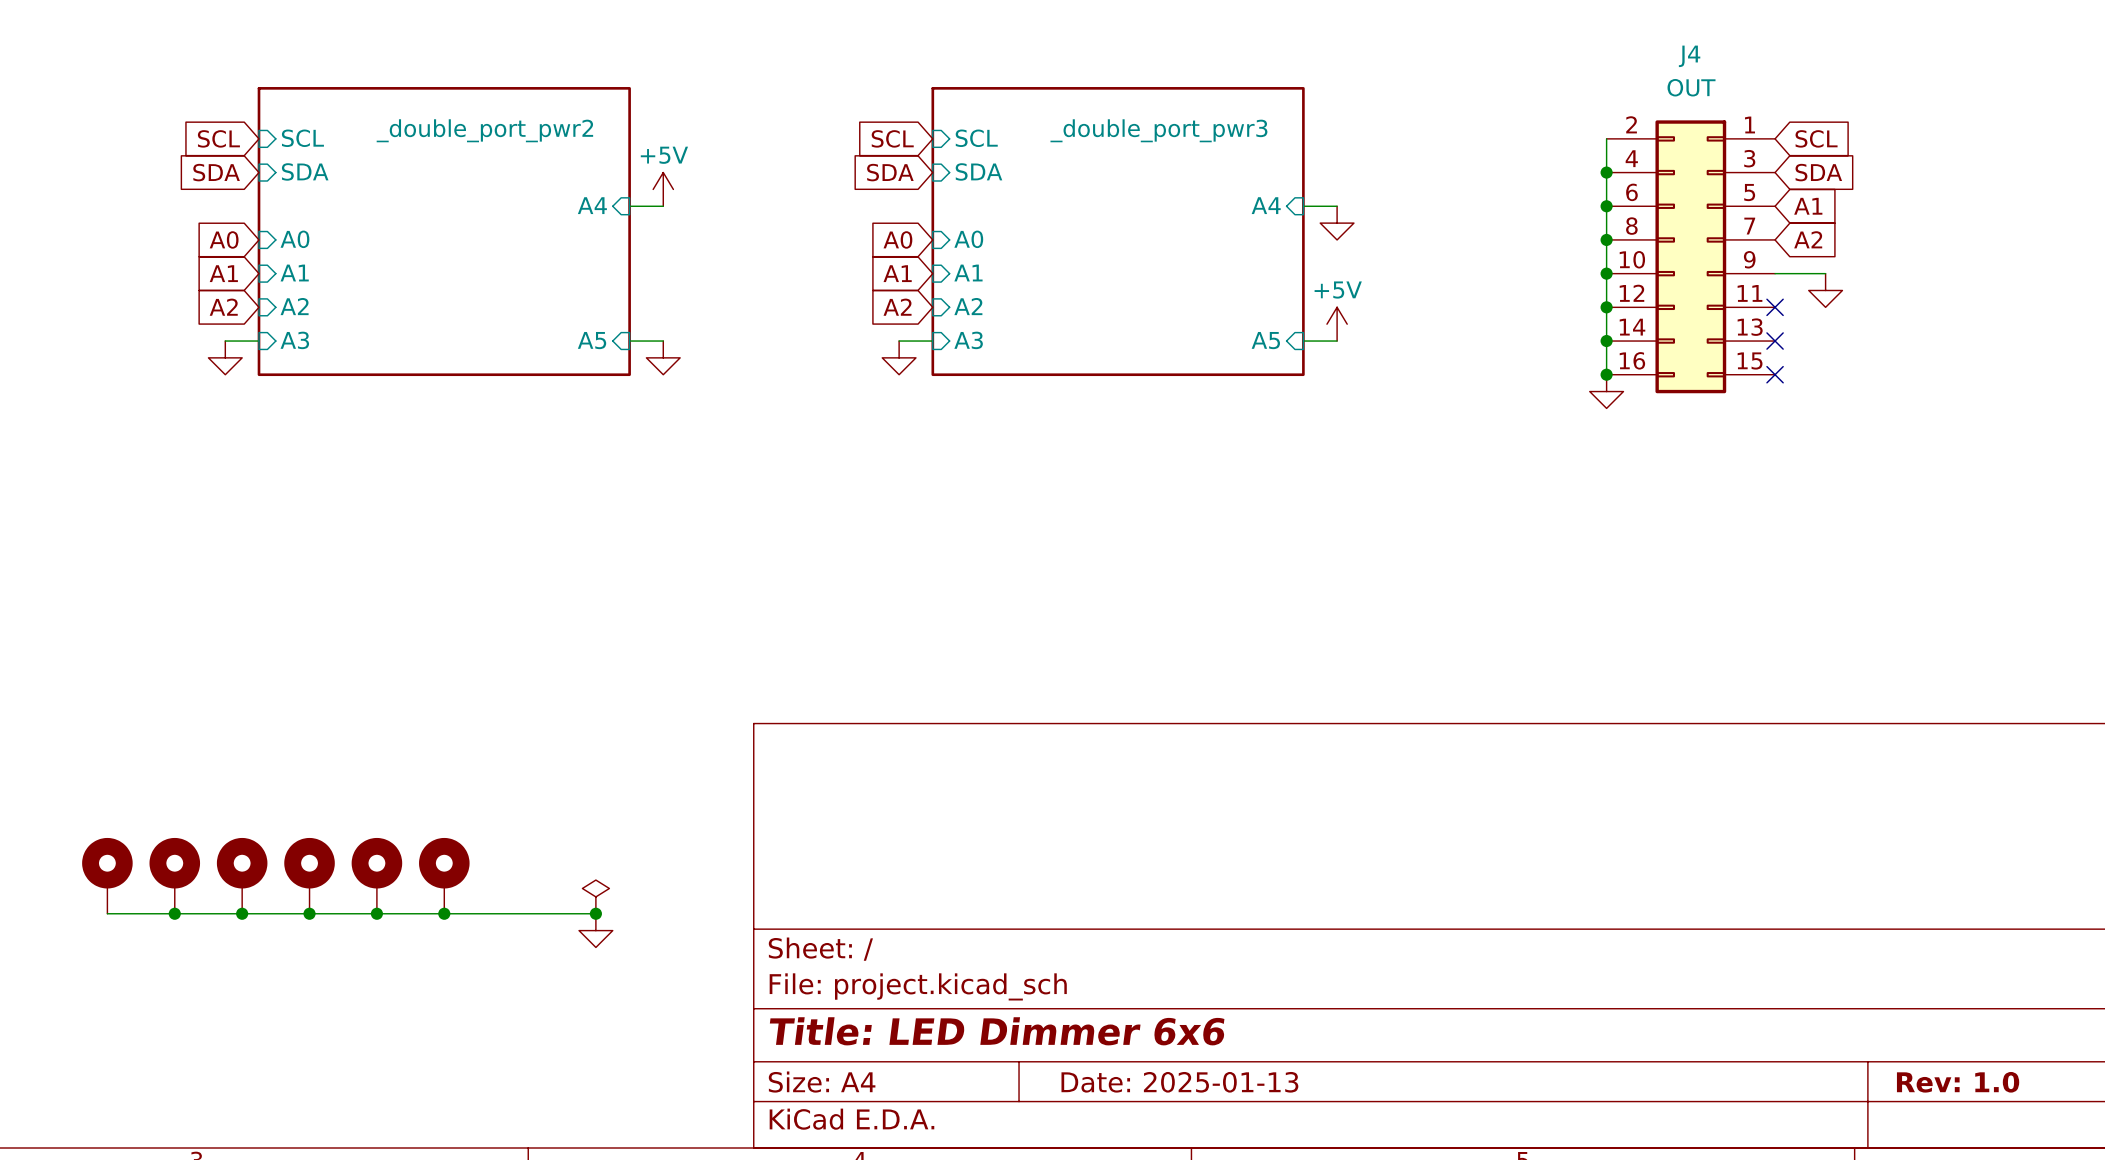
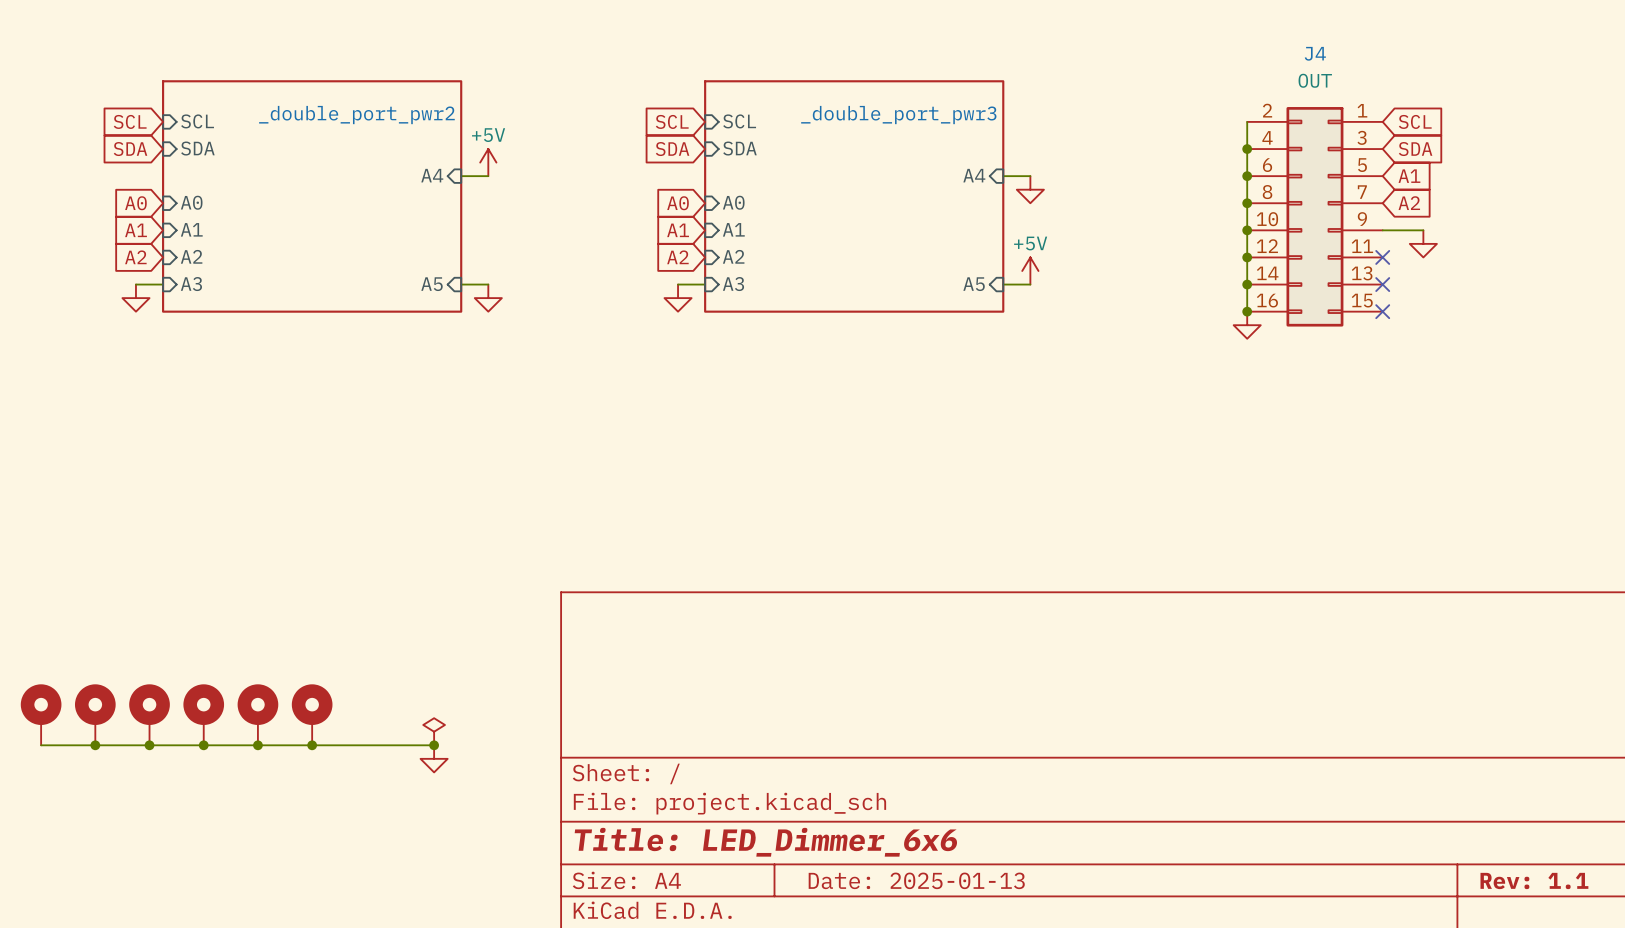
title block: Title: LED Dimmer 6x6 (997, 1031) -> Title: LED_Dimmer_6x6 (765, 842)
title block: Rev: 1.0 (1958, 1082) -> Rev: 1.1 (1534, 881)

